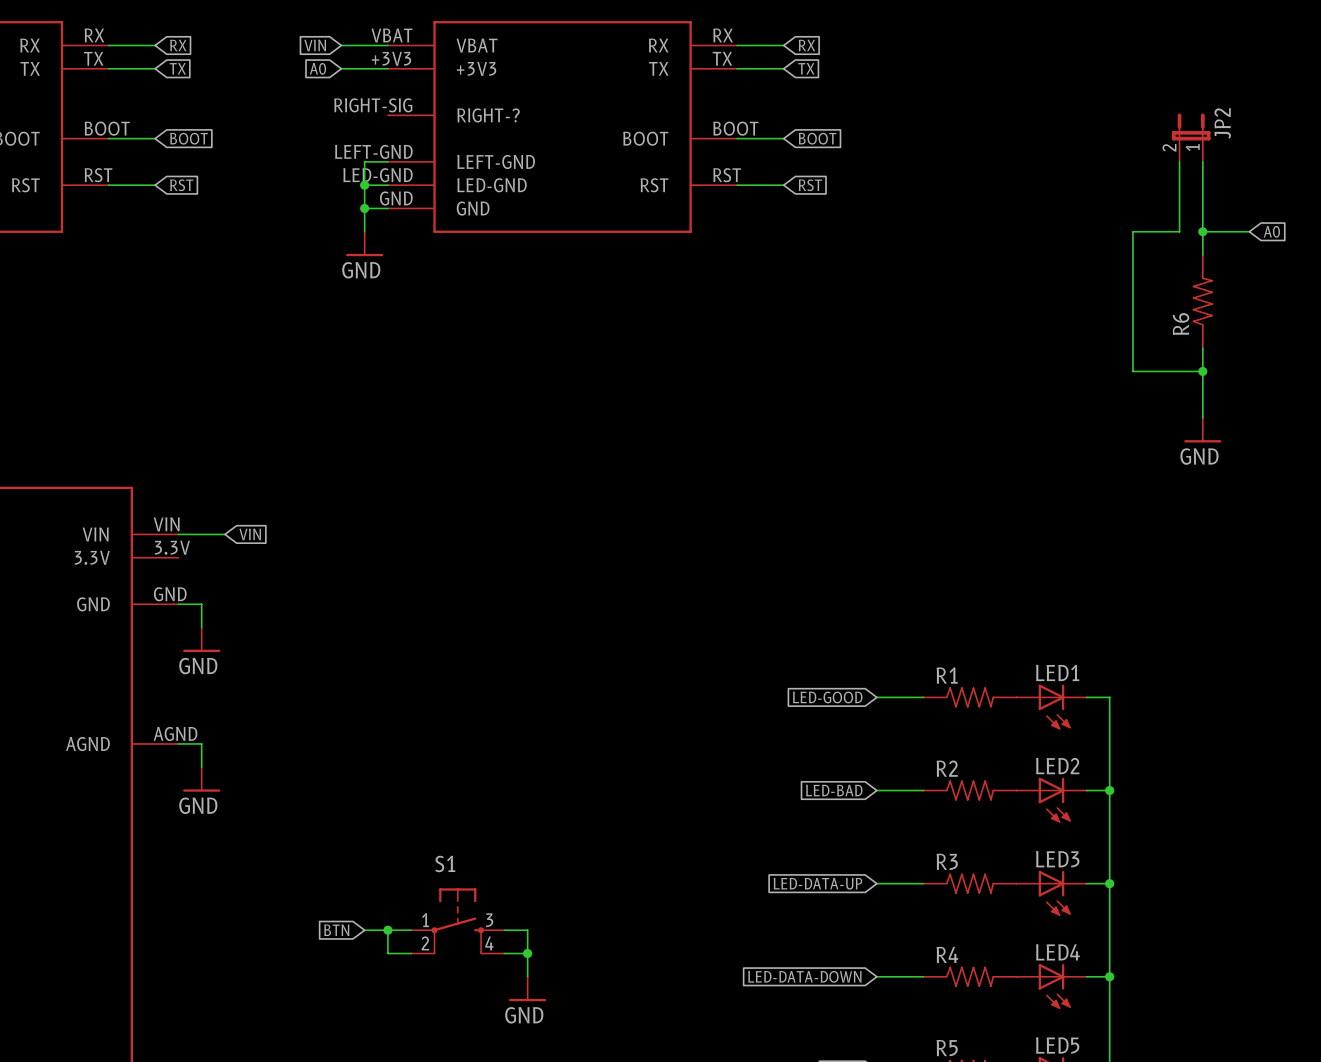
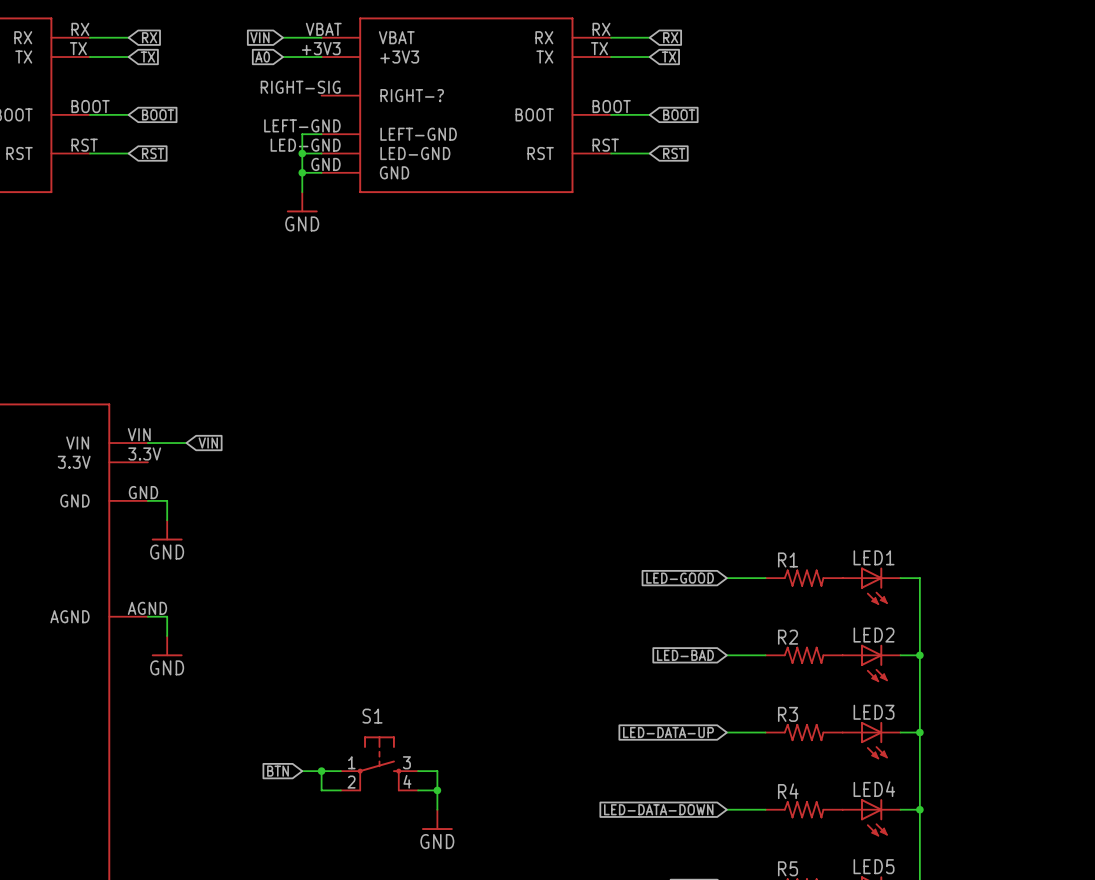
JP2: (1191, 137) -> none
wire: (1179, 161) (1179, 231) (1132, 231) (1132, 371) (1202, 371) -> none
wire: (1202, 161) (1202, 255) -> none
wire: (1202, 231) (1249, 231) -> none
junction: (1202, 231) -> none
global label: A0 (1271, 231) -> none
R6: (1202, 301) -> none
wire: (1202, 348) (1202, 418) -> none
junction: (1202, 371) -> none
power symbol: GND (1202, 430) -> none

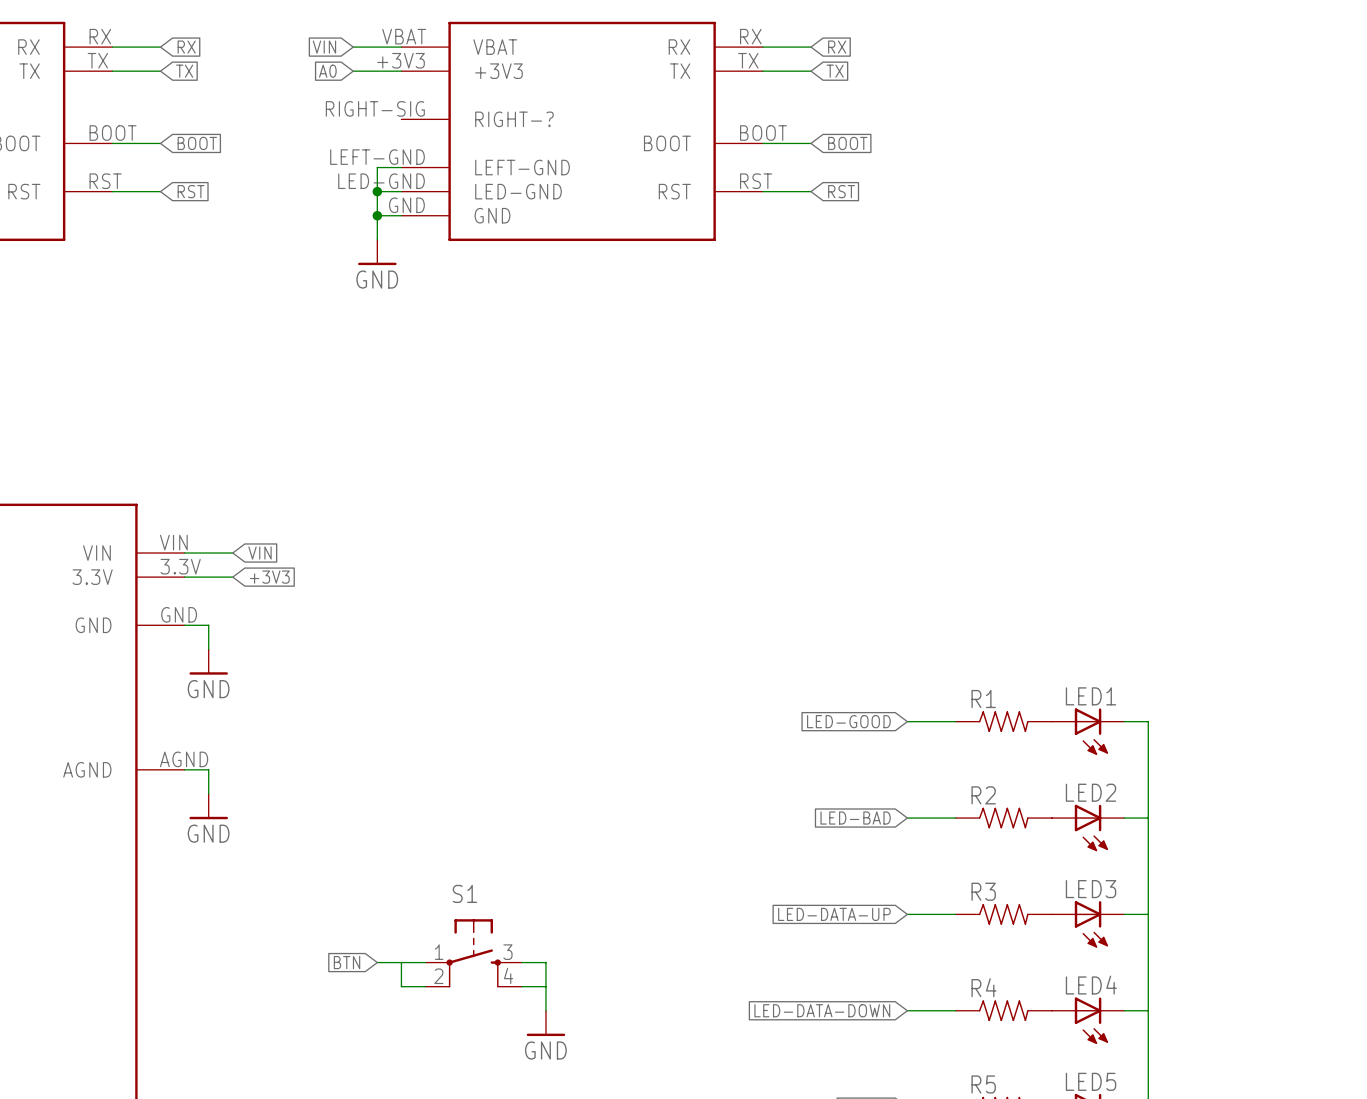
wire: none -> (184, 577) (232, 577)
global label: none -> +3V3 (269, 577)
junction: (919, 655) -> none
junction: (919, 732) -> none
junction: (321, 771) -> none
junction: (437, 790) -> none
junction: (919, 809) -> none

